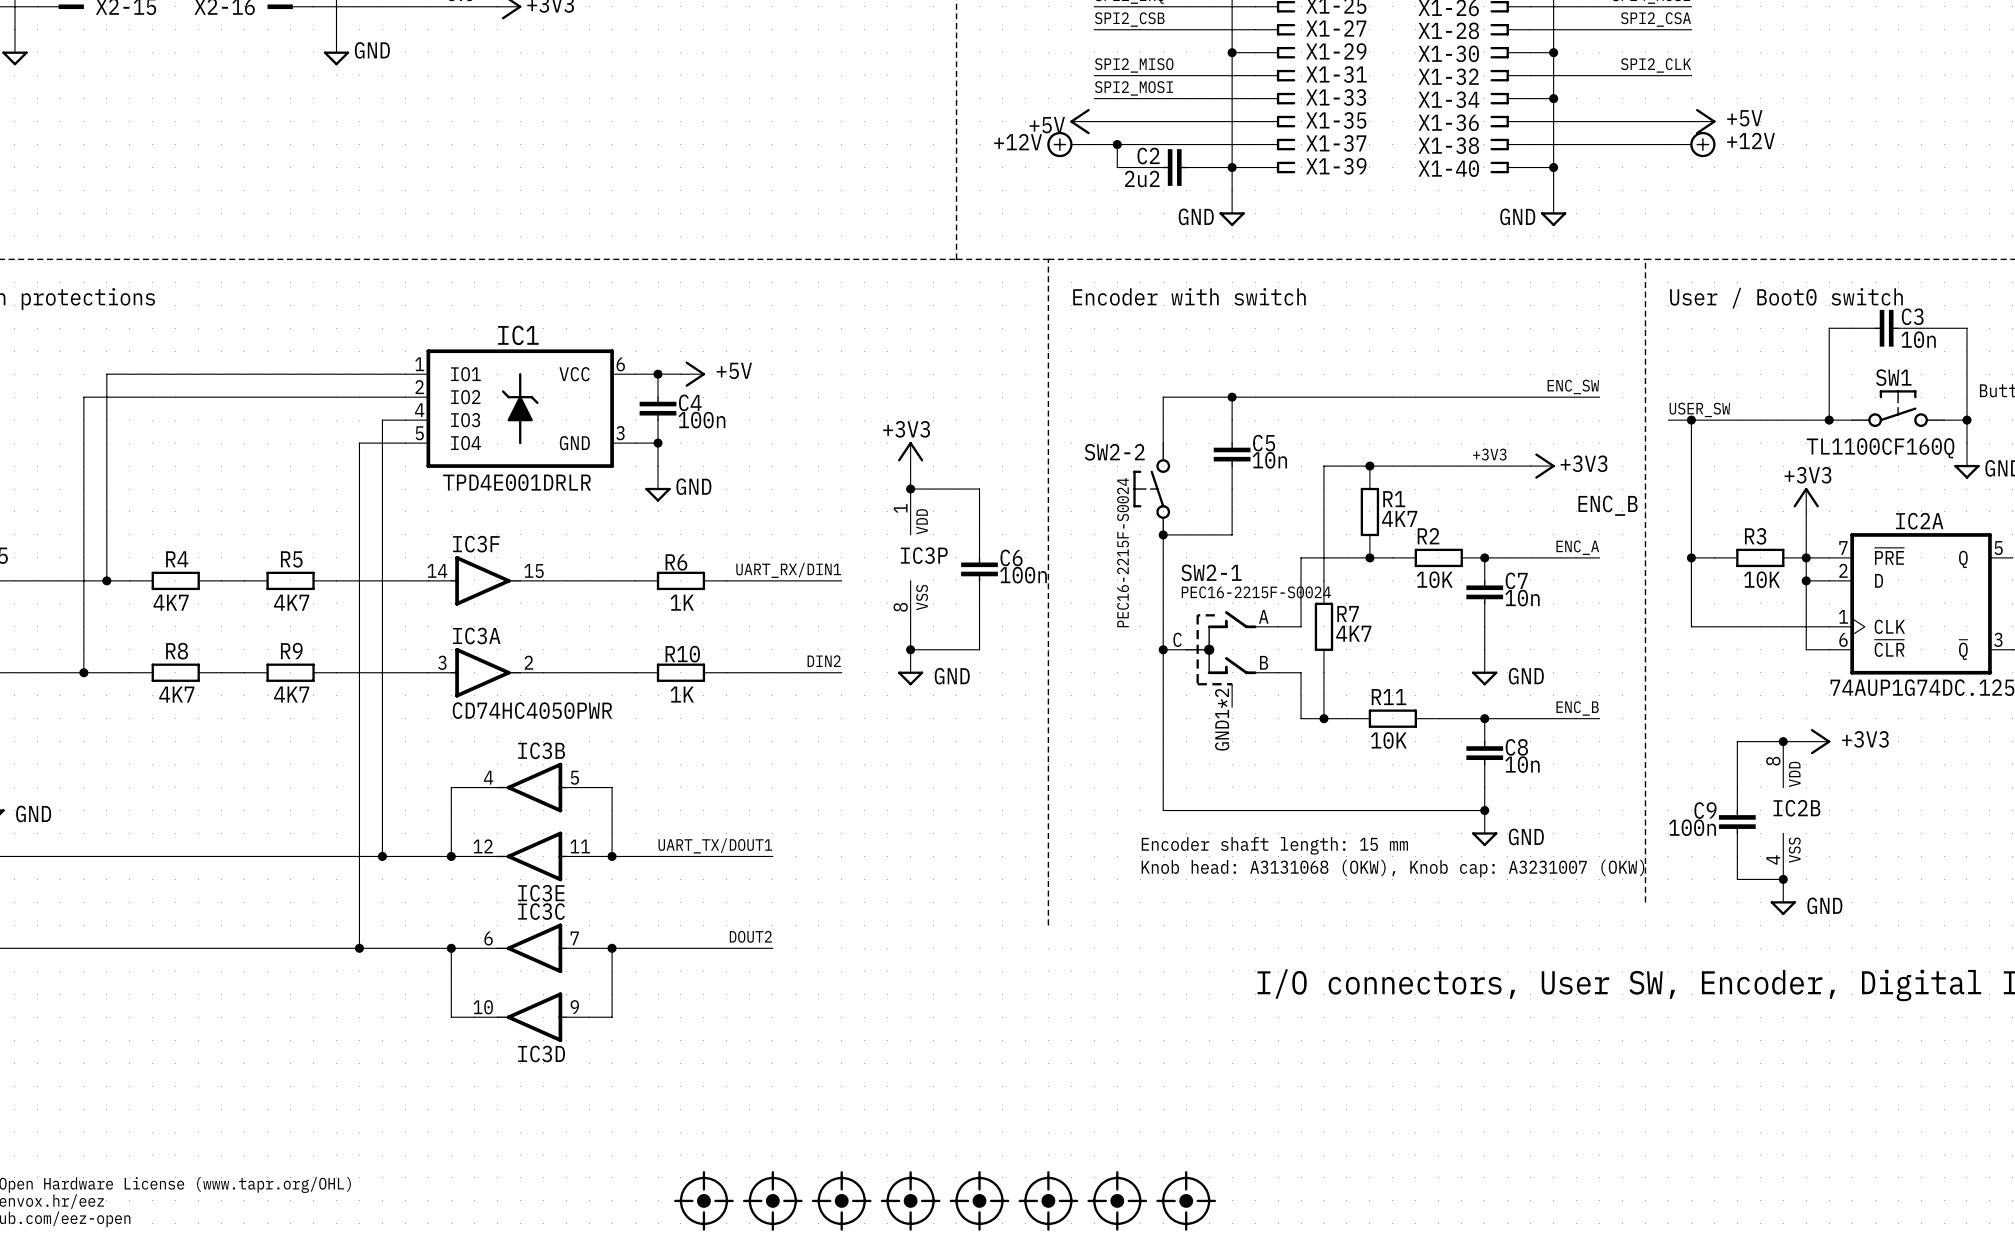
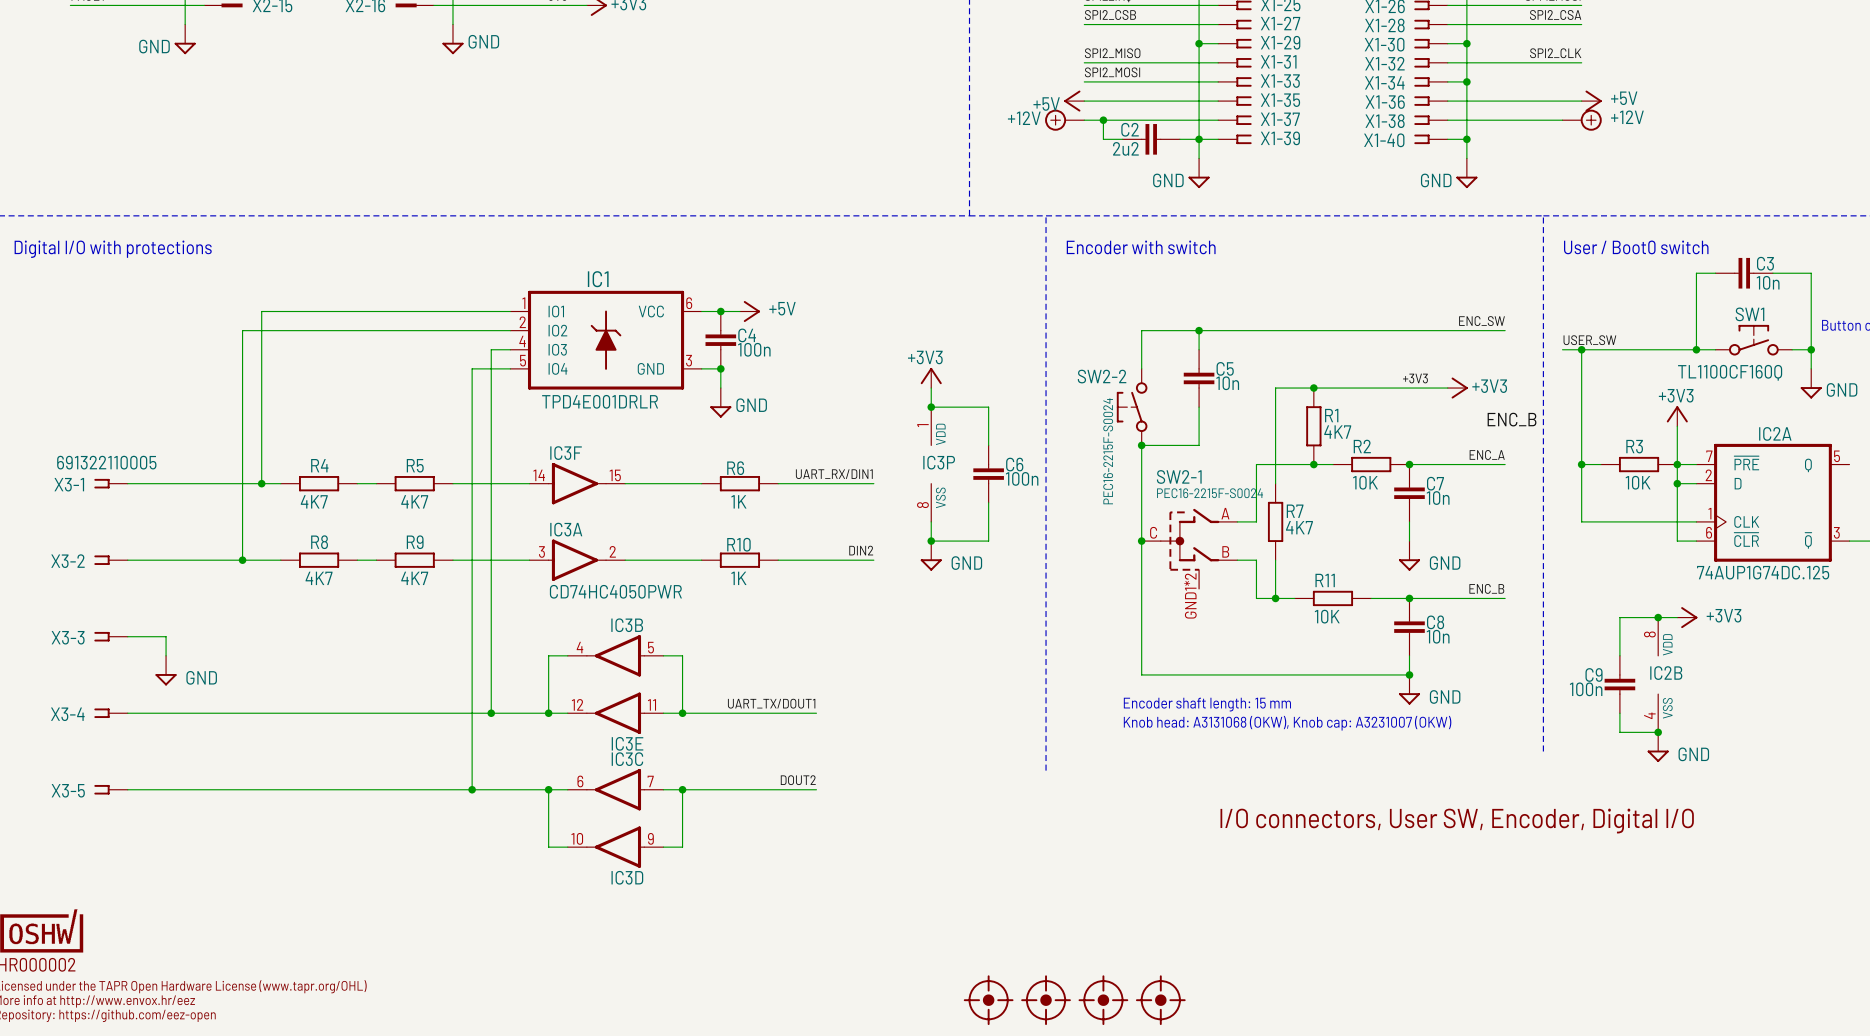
part: (703, 1200) -> none
part: (772, 1200) -> none
part: (841, 1200) -> none
part: (910, 1200) -> none

